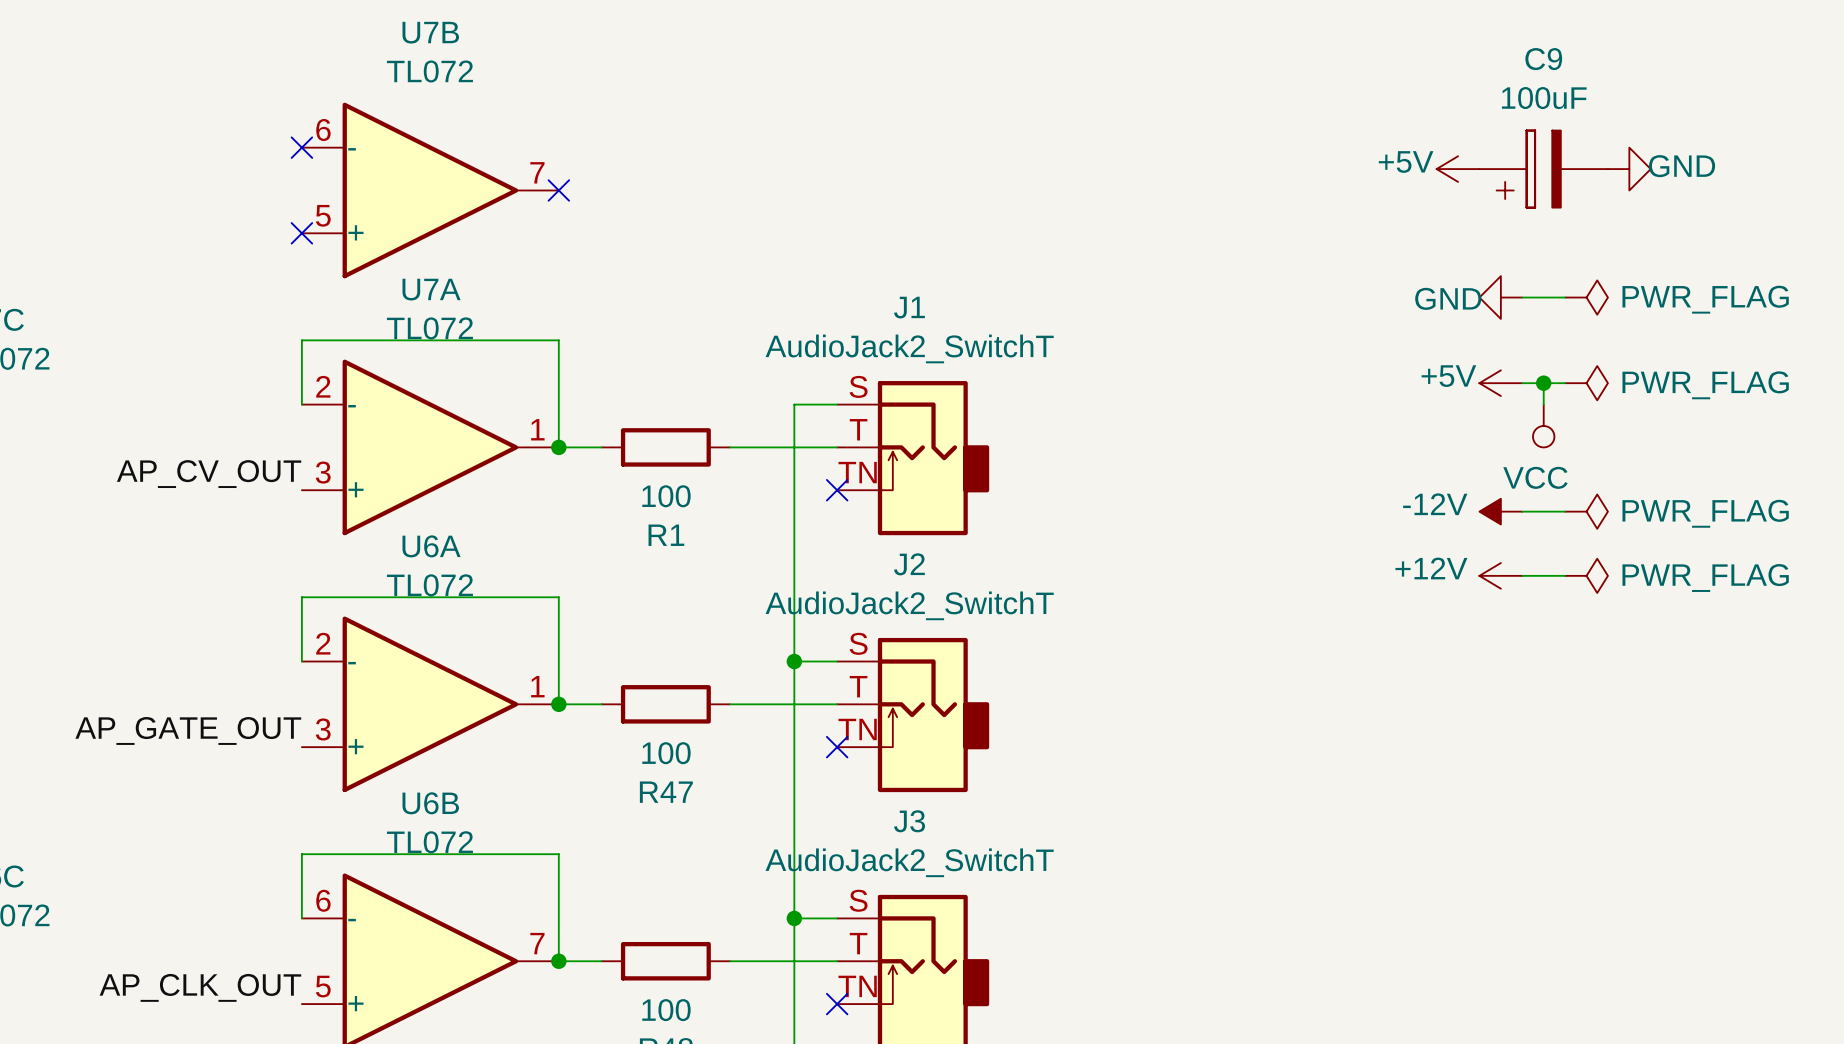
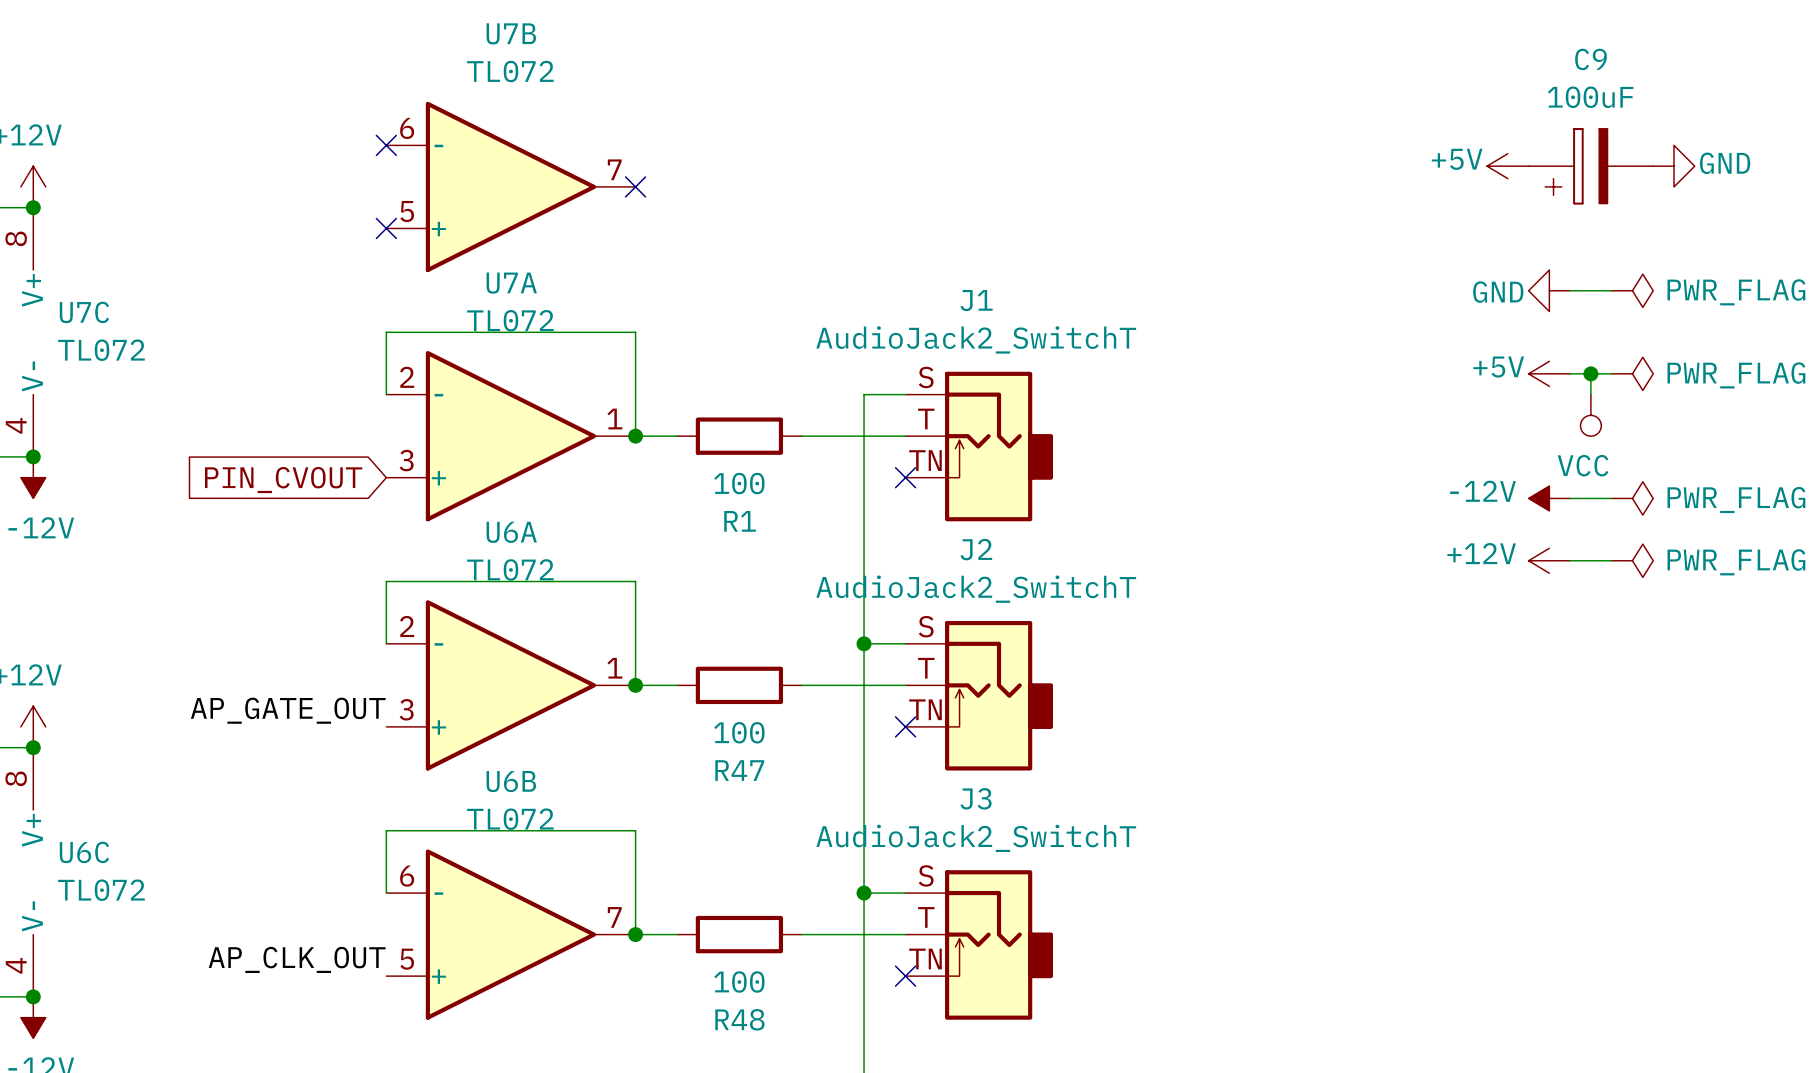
label: AP_CV_OUT (209, 474) -> none
global label: none -> PIN_CVOUT (283, 480)

